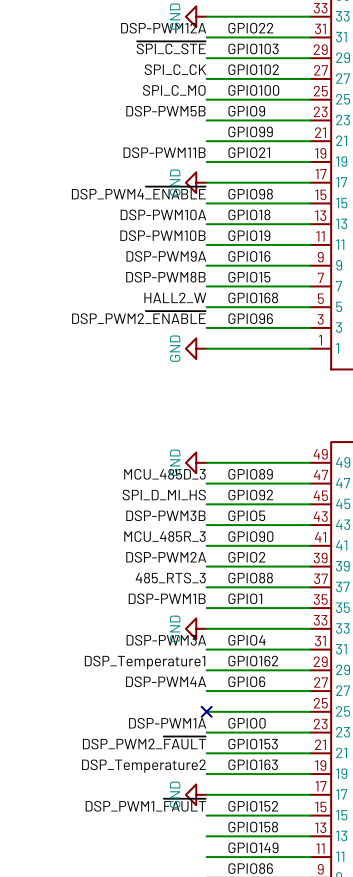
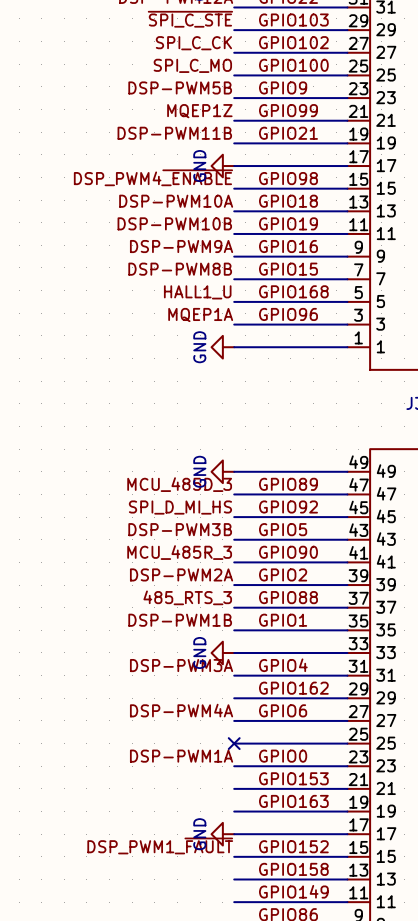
label: none -> MQEP1Z (199, 111)
label: HALL2_W (175, 297) -> HALL1_U (197, 292)
label: DSP_PWM2~{_ENABLE} (138, 317) -> MQEP1A (200, 315)
label: DSP_Temperature1 (145, 662) -> none
label: DSP_PWM2_~{FAULT} (144, 742) -> none
label: DSP_Temperature2 (143, 766) -> none

